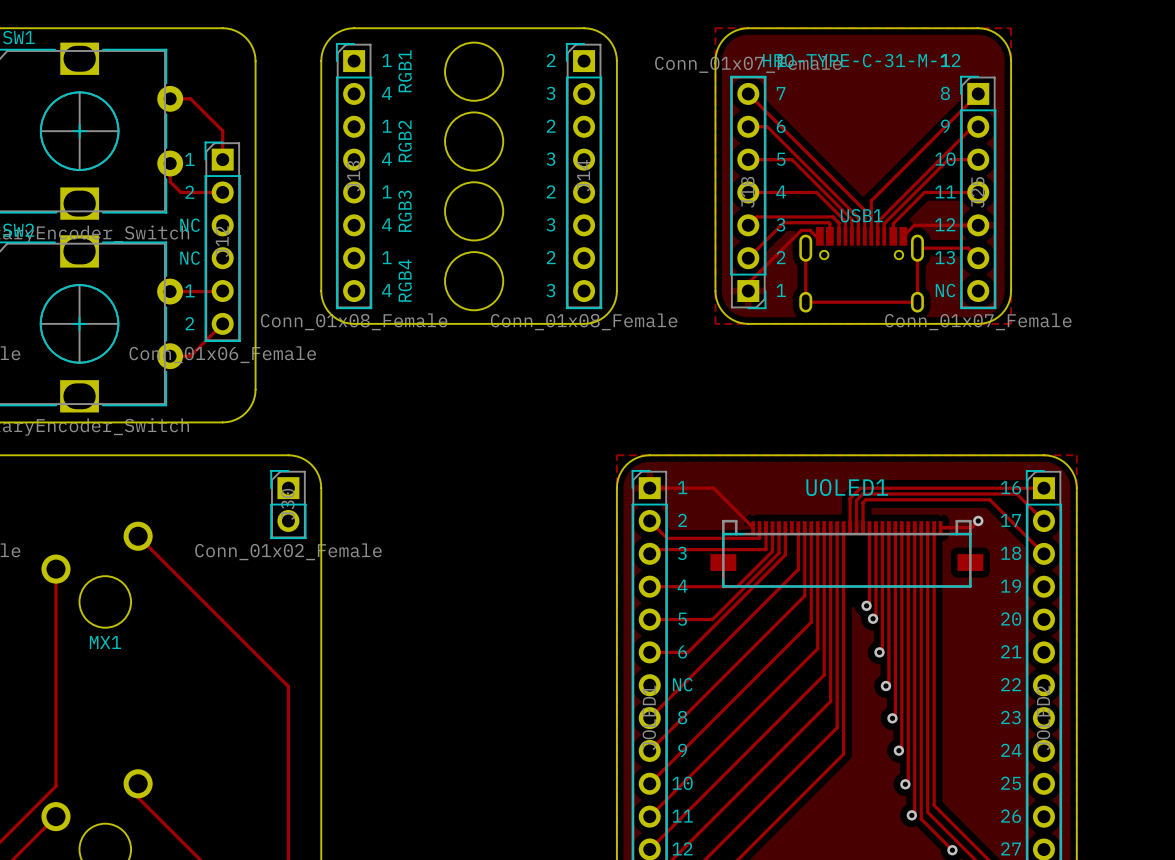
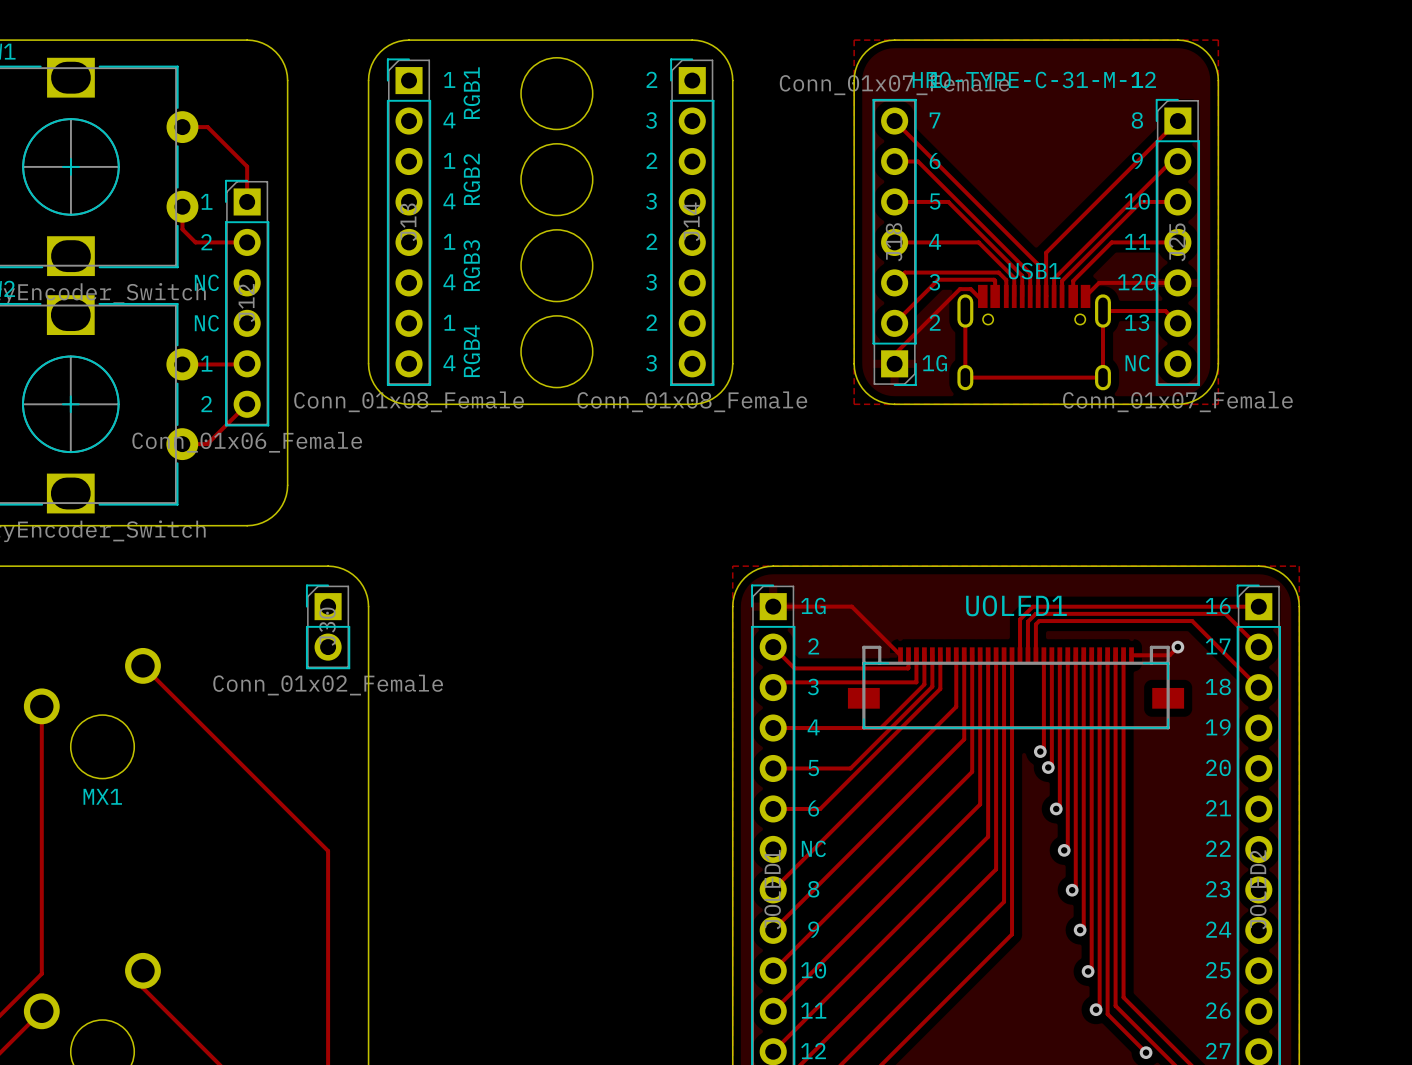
text: 12 (945, 224) -> 12G (1137, 282)
text: 1 (781, 290) -> 1G (934, 363)
text: 1 (682, 487) -> 1G (813, 606)

